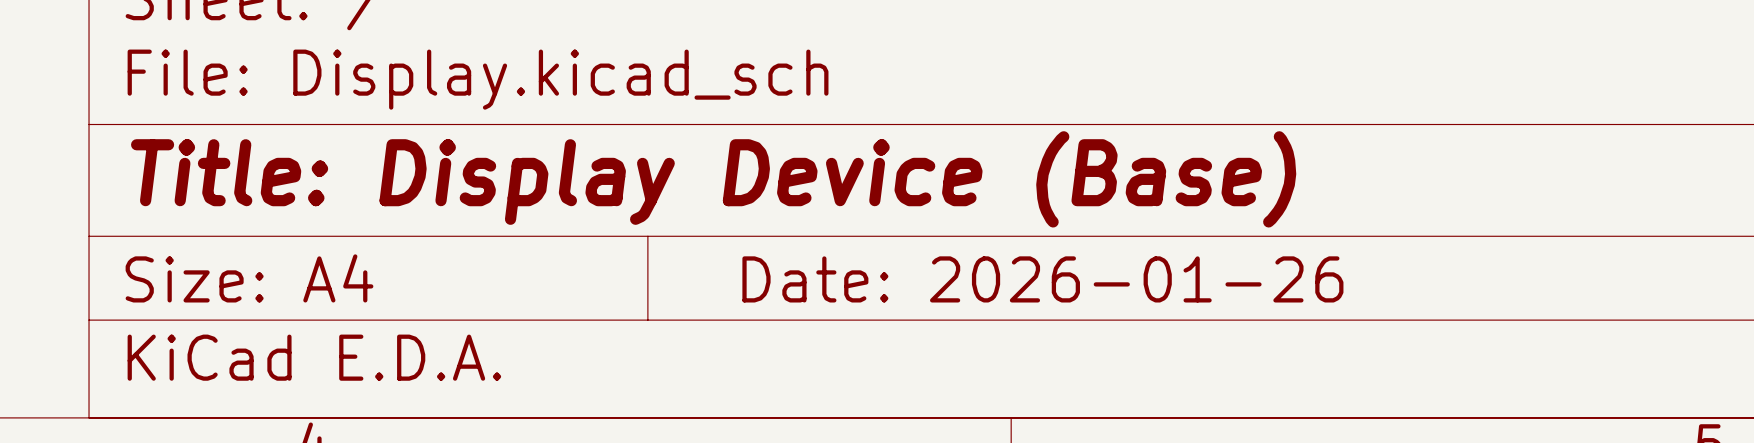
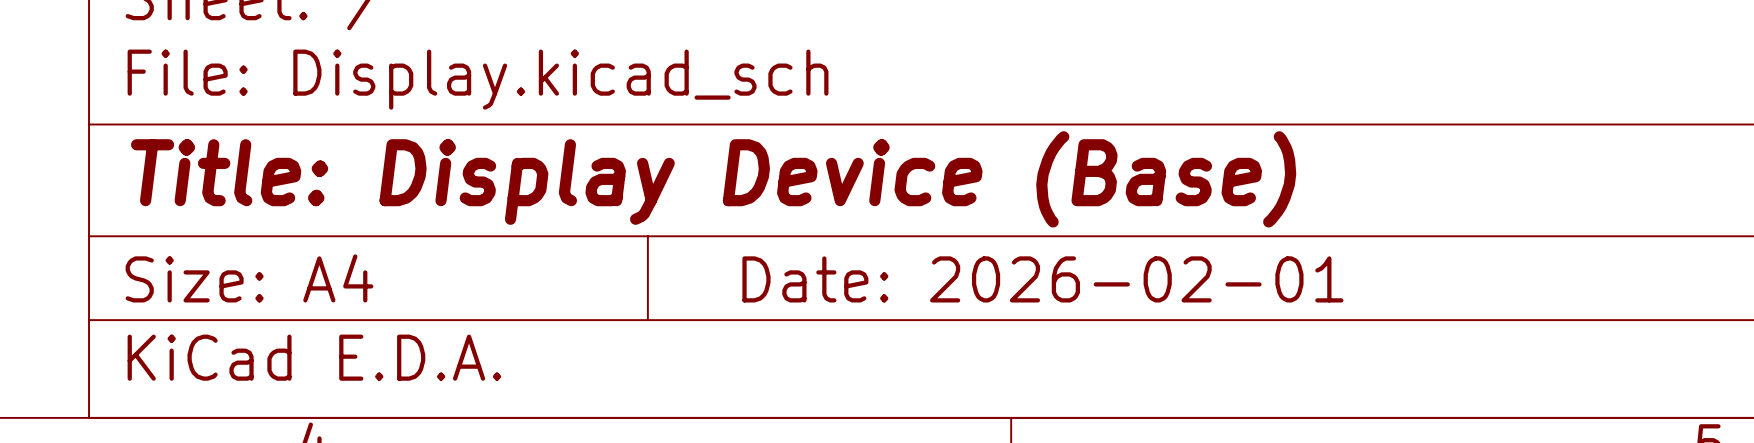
title block: Date: 2026-01-26 (1042, 279) -> Date: 2026-02-01 (1042, 279)

